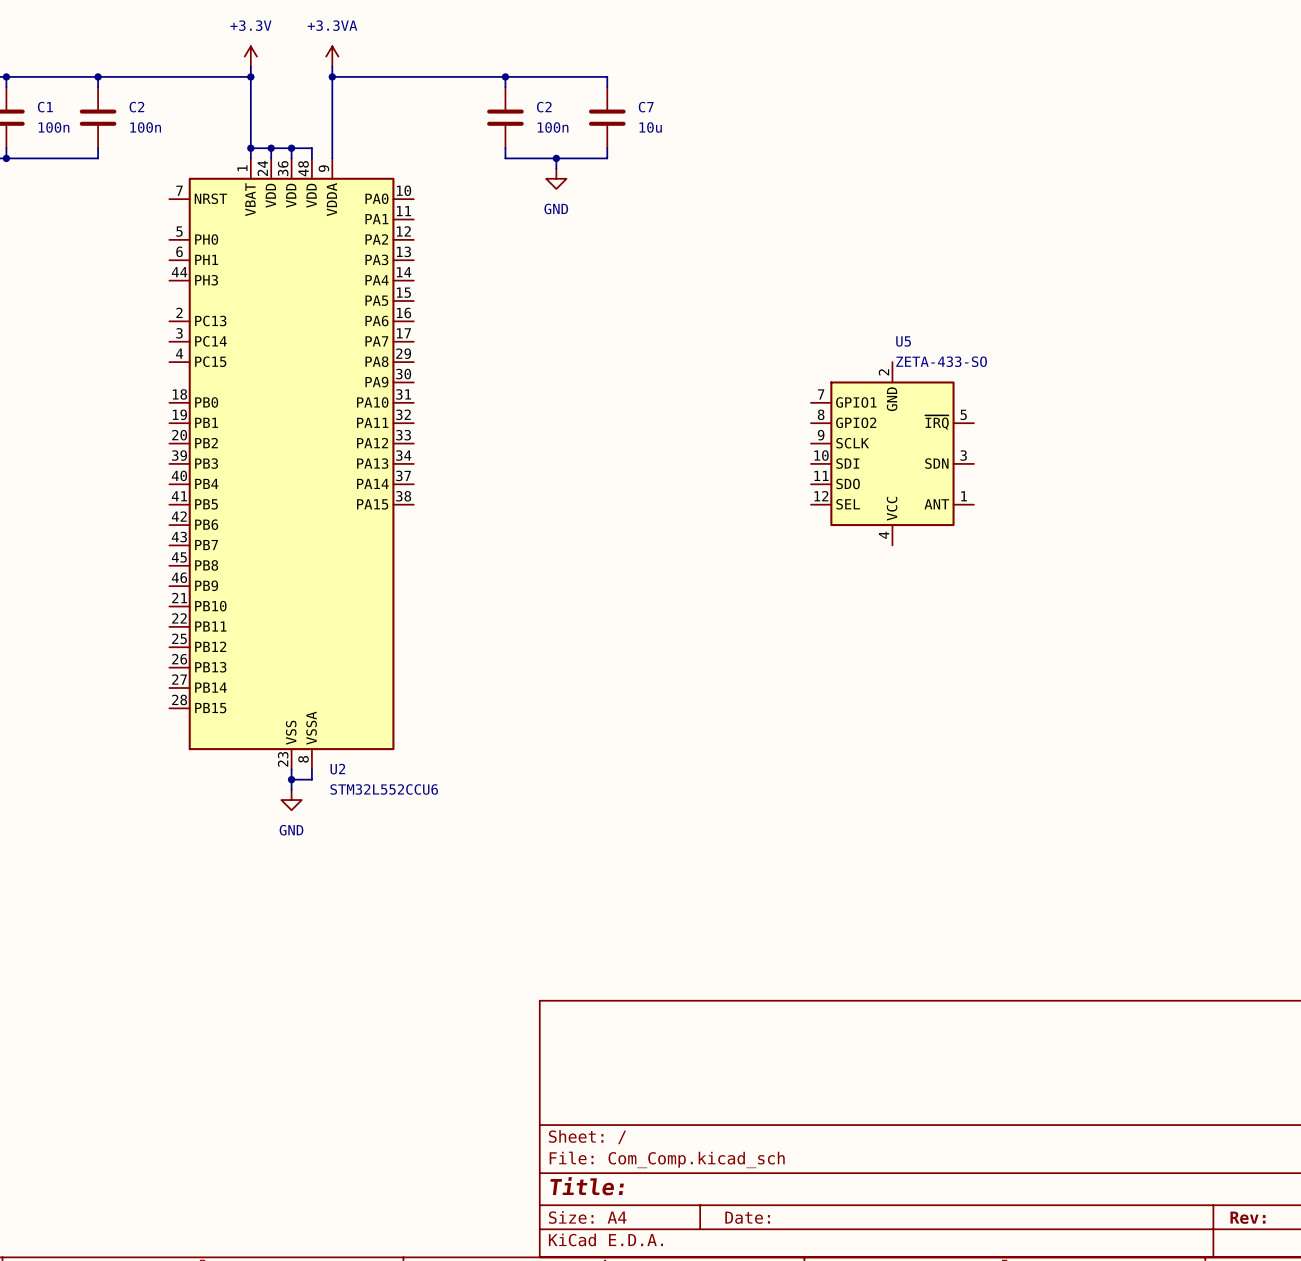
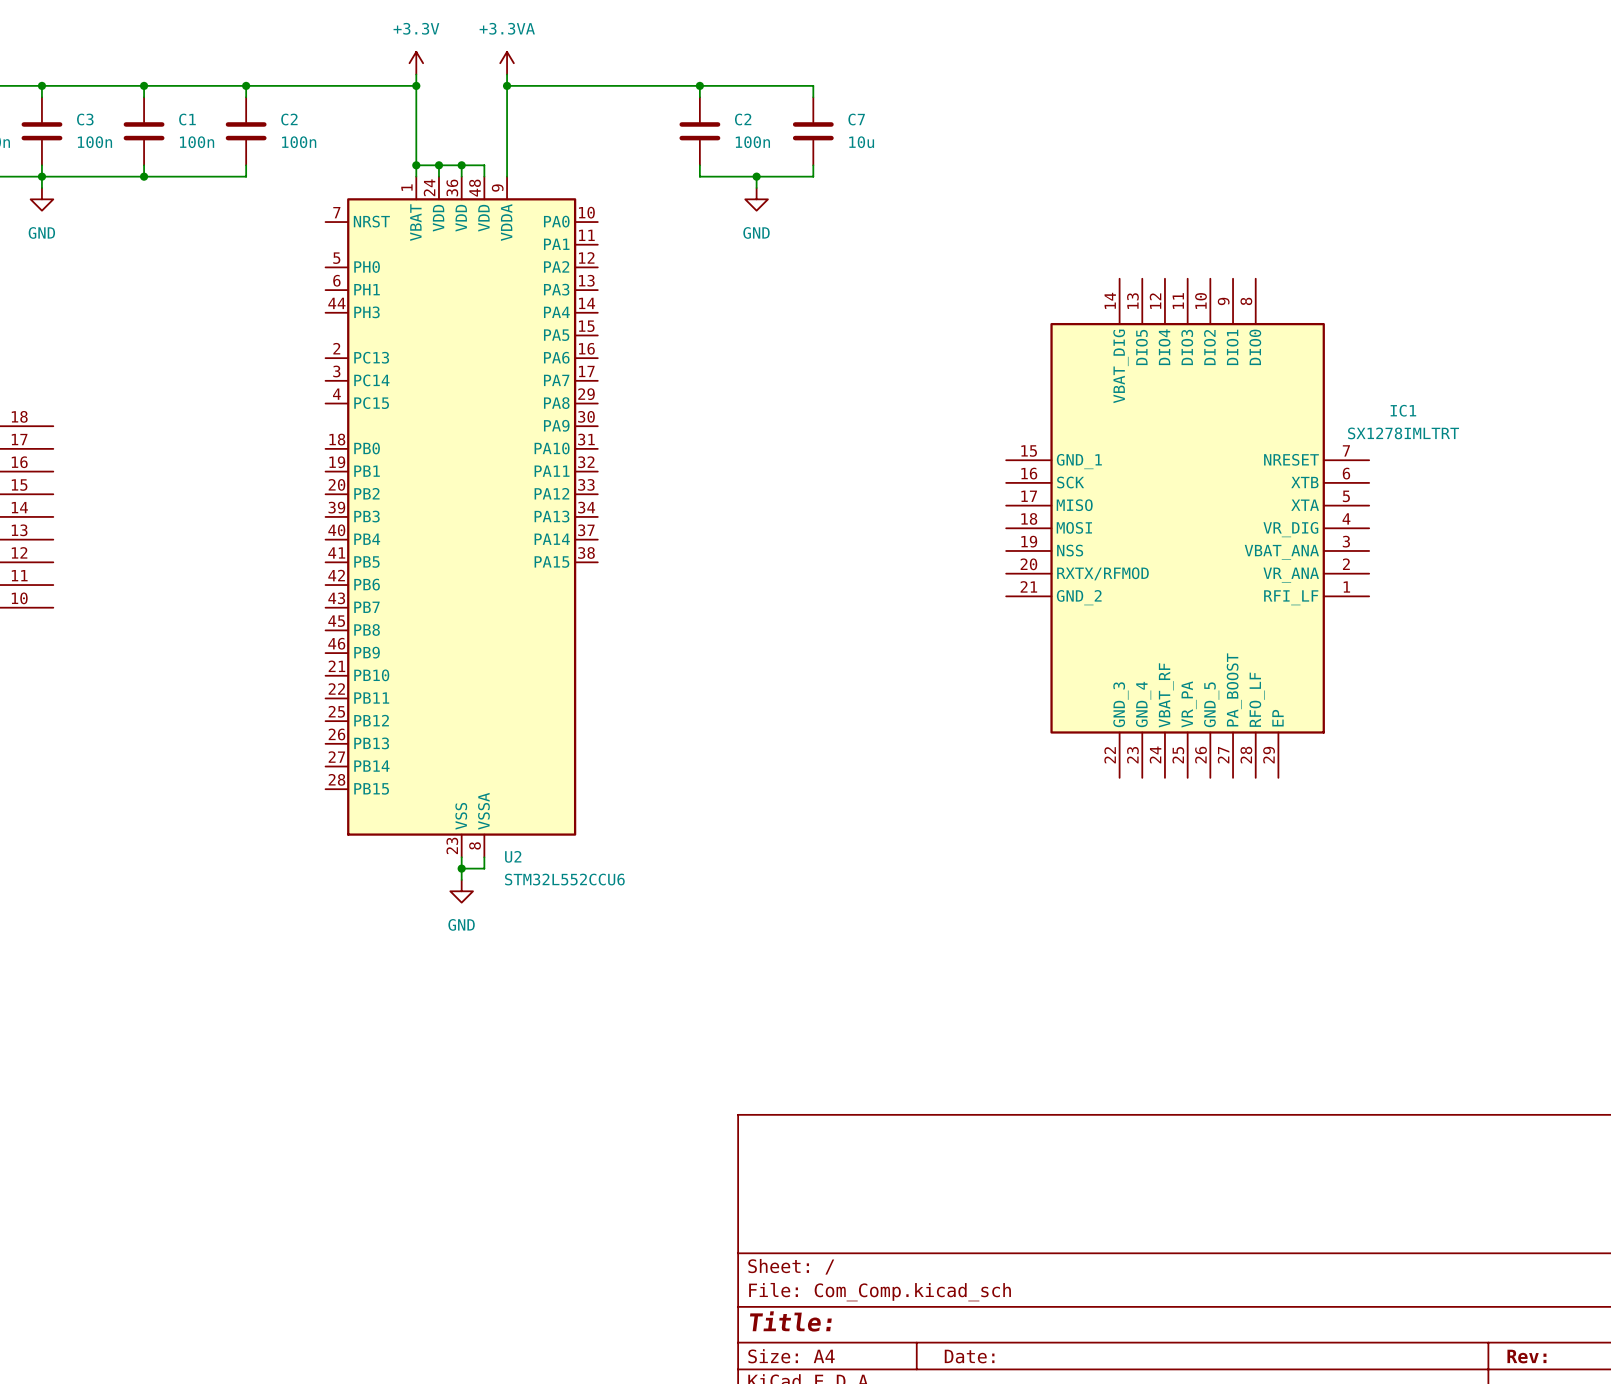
U5: ZETA-433-SO (892, 453) -> none
IC1: none -> SX1278IMLTRT (1187, 528)

